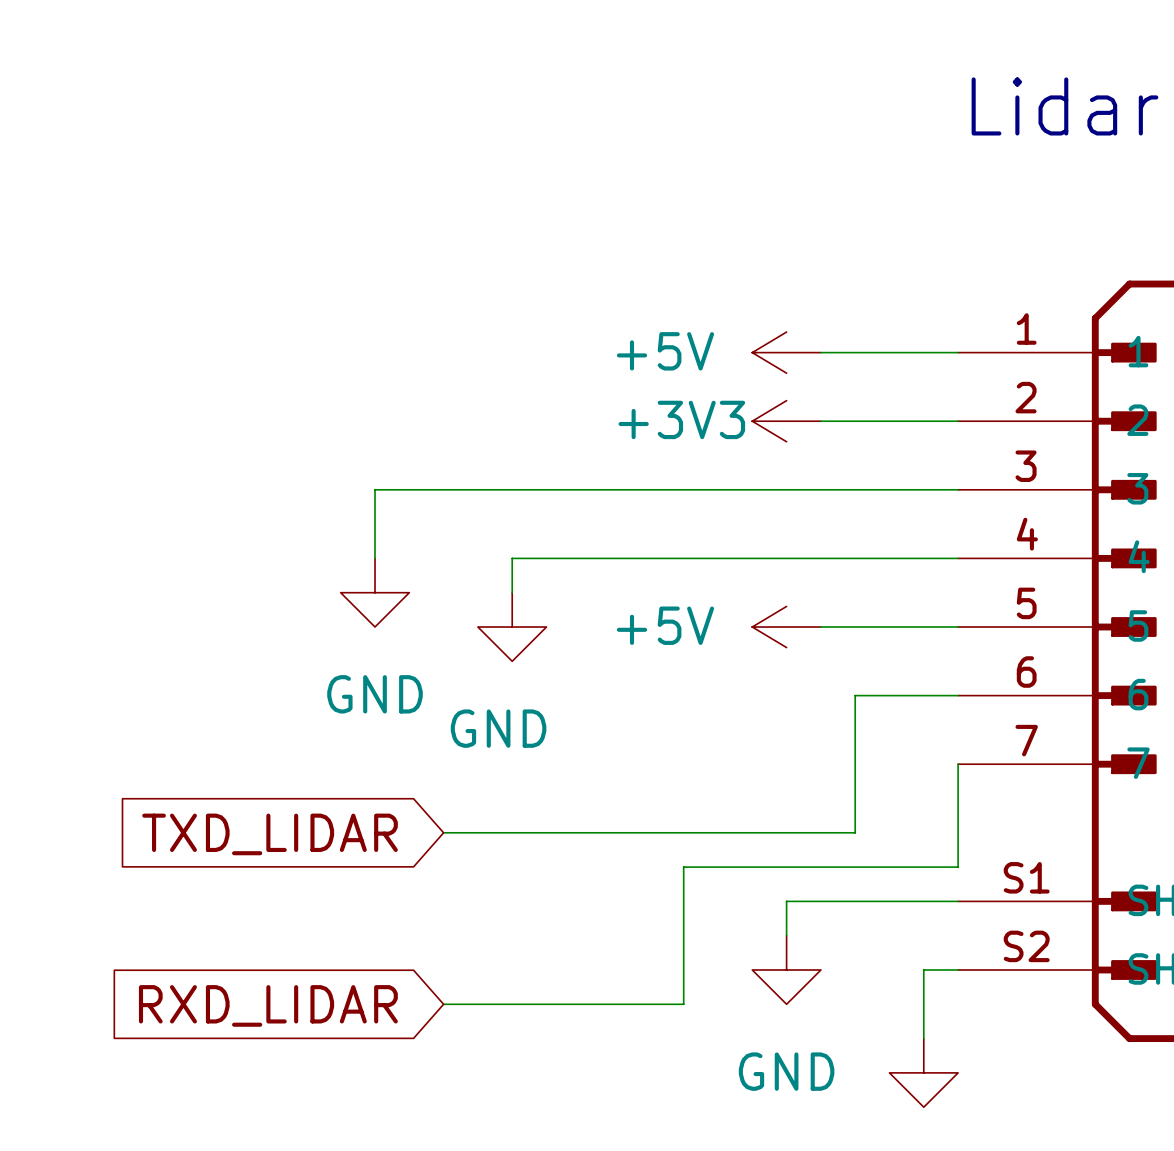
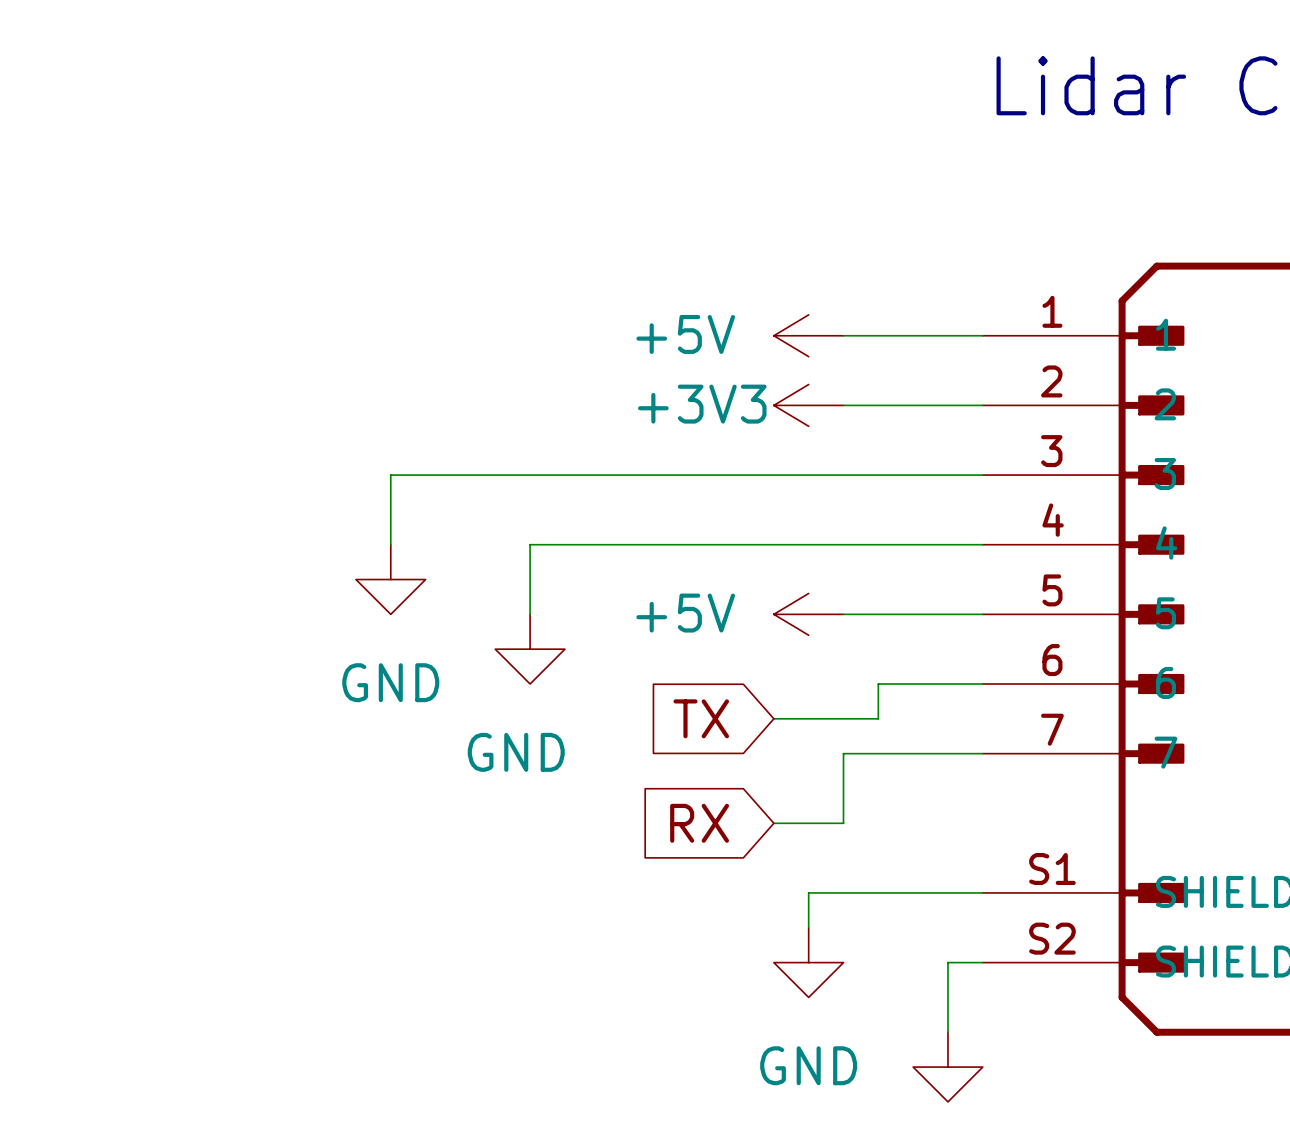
power symbol position: GND (512, 627) -> GND (530, 649)
global label: none -> TX (701, 718)
wire: none -> (773, 718) (878, 718)
wire: (855, 729) (855, 832) (820, 832) -> (982, 753) (843, 753) (843, 823)
wire: (958, 764) (958, 867) (683, 867) (683, 1004) (443, 1004) -> none
wire: (443, 832) (752, 832) -> none
global label: none -> RX (699, 823)
global label: TXD_LIDAR (270, 834) -> none
global label: RXD_LIDAR (268, 1005) -> none

